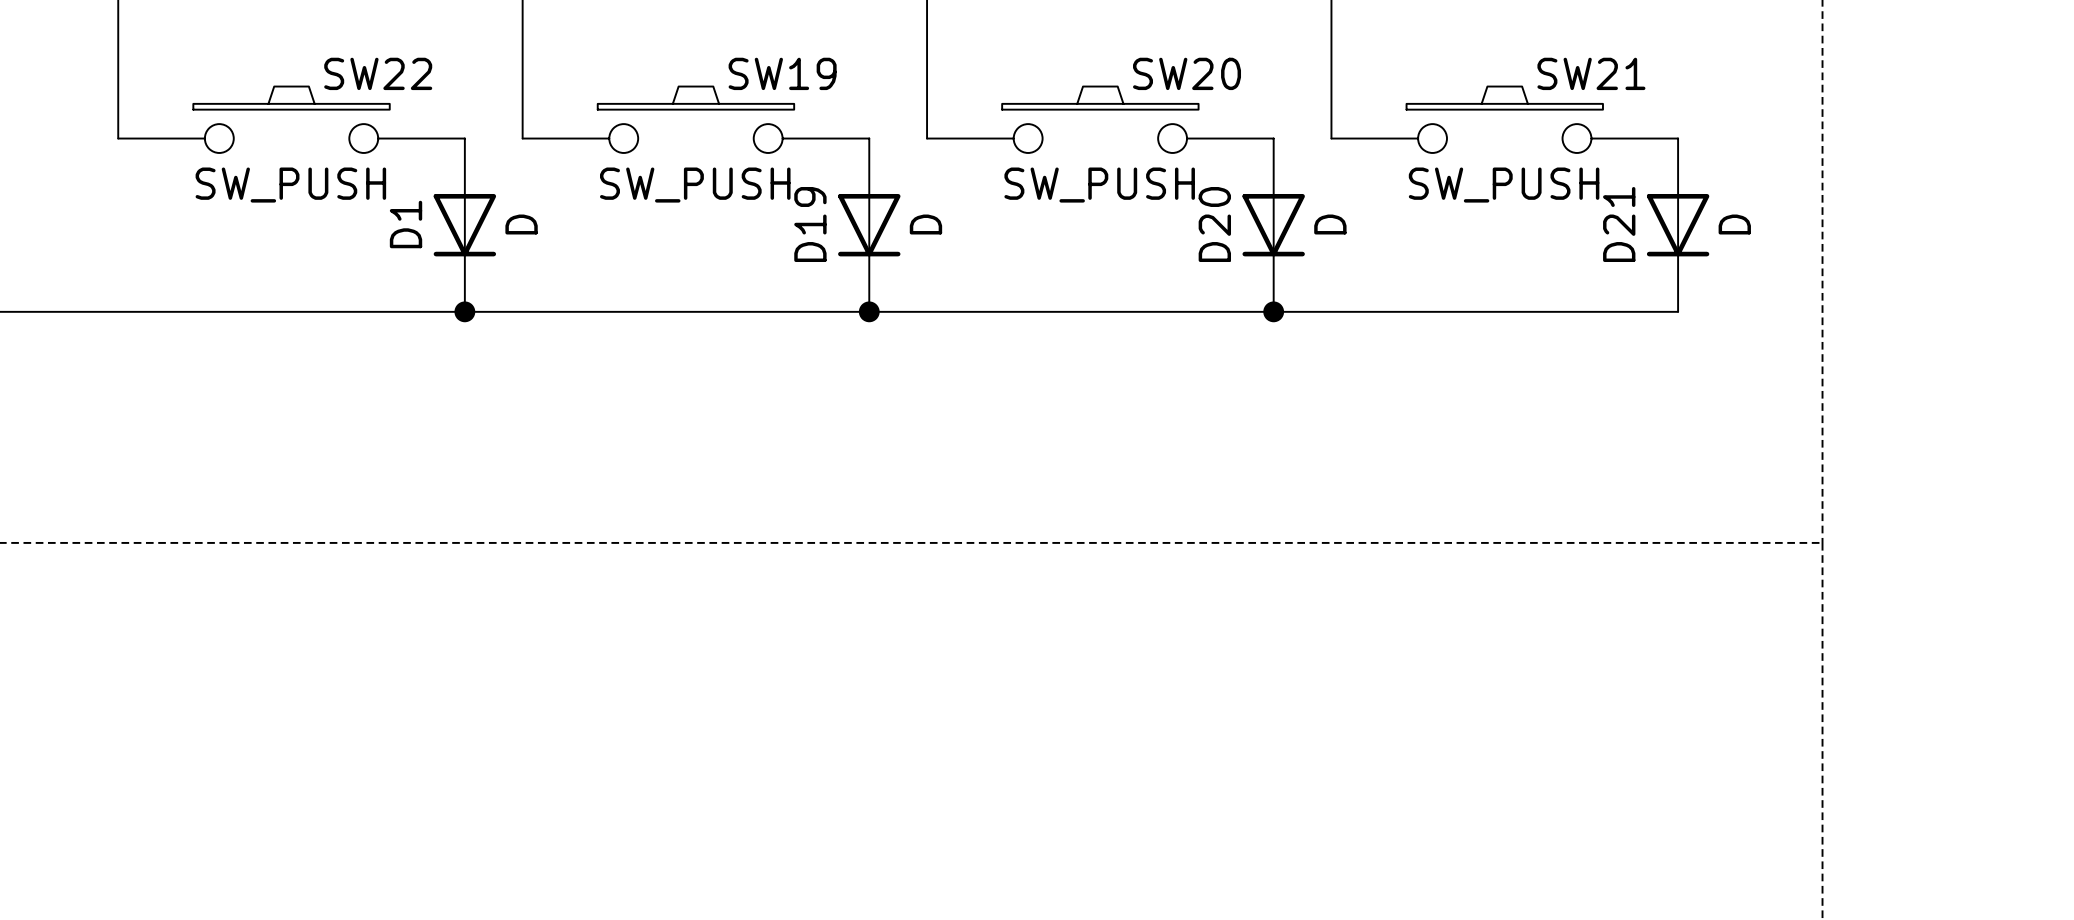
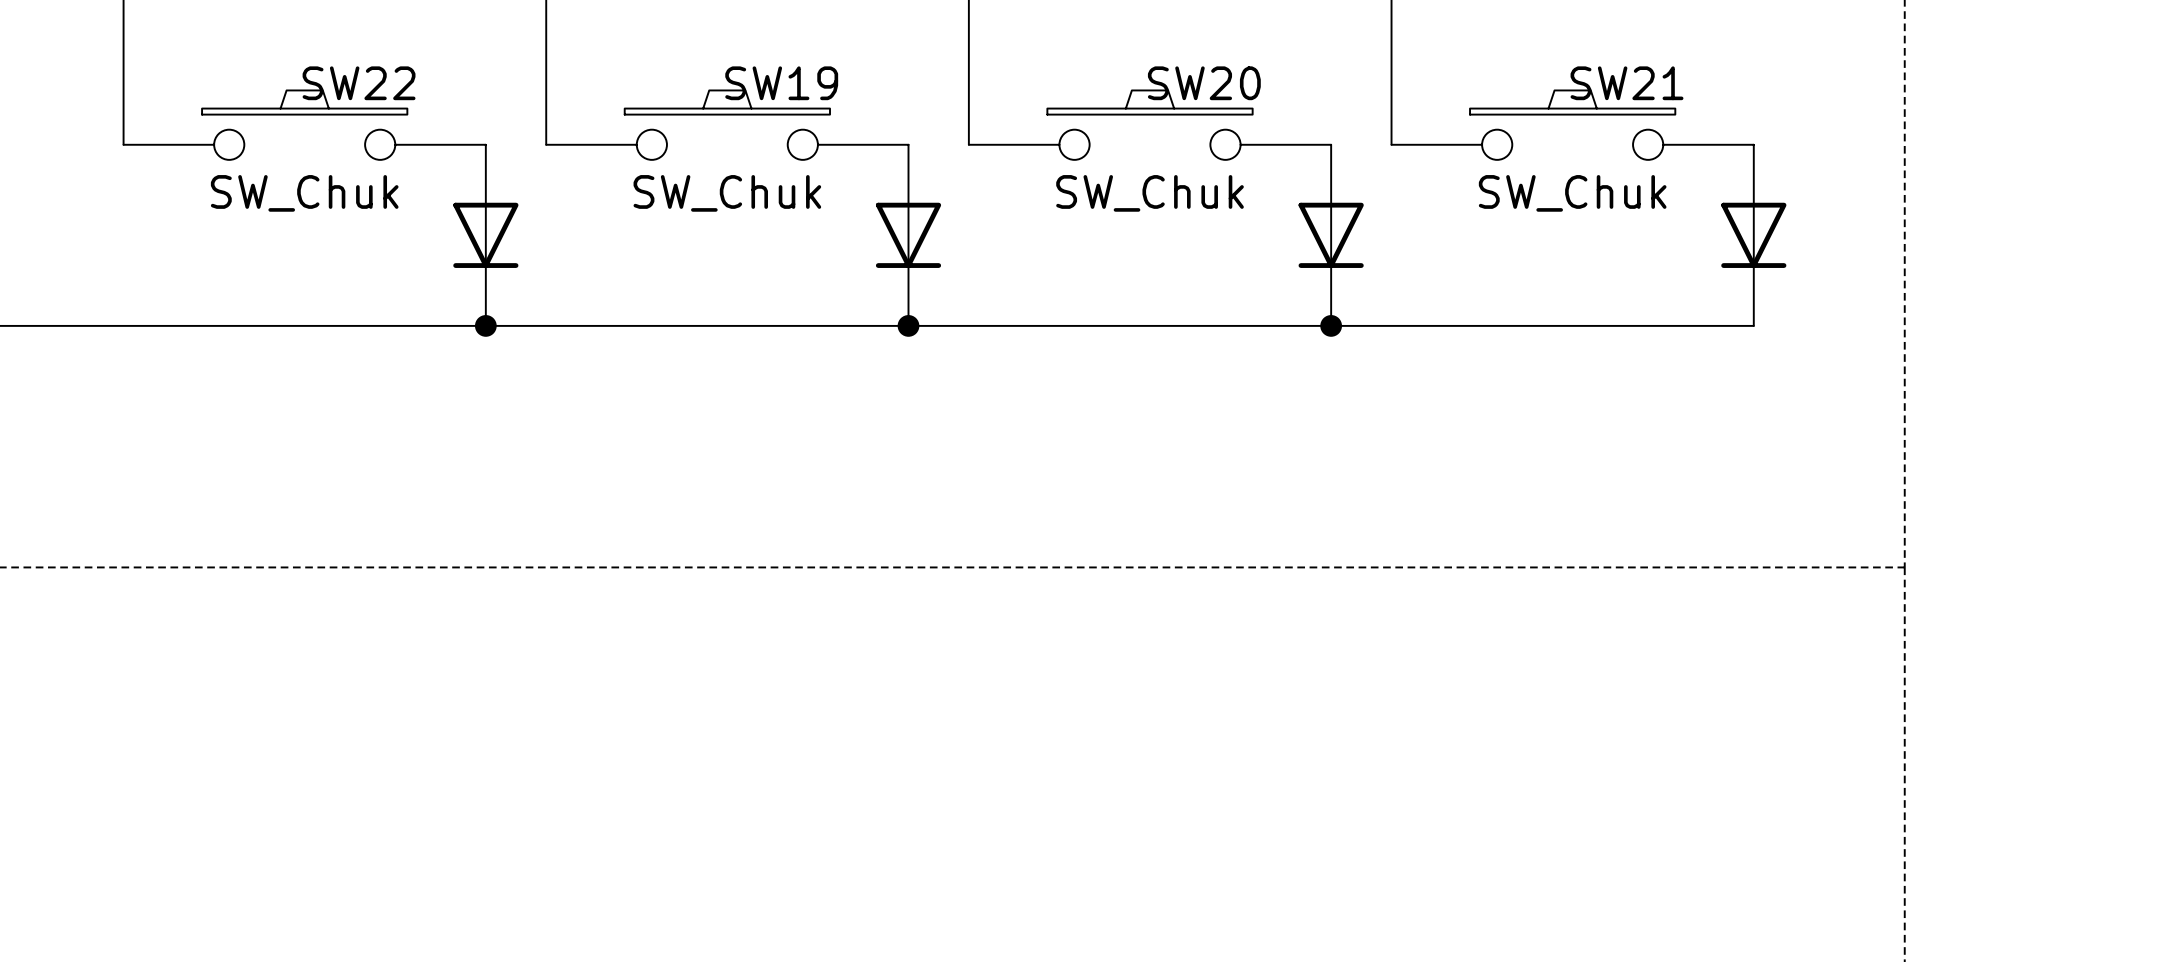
SW22 name position: SW22 (378, 73) -> SW22 (359, 83)
SW19 name position: SW19 (782, 73) -> SW19 (781, 83)
SW20 name position: SW20 (1187, 73) -> SW20 (1204, 83)
SW21 name position: SW21 (1591, 73) -> SW21 (1627, 83)
SW22 symbol: [118, 86, 465, 153] -> [123, 90, 519, 326]
SW19 symbol: [522, 86, 870, 153] -> [546, 90, 942, 326]
SW20 symbol: [927, 86, 1274, 153] -> [968, 90, 1364, 326]
SW21 symbol: [1331, 86, 1679, 153] -> [1391, 90, 1787, 326]
SW22 value: SW_PUSH (290, 185) -> SW_Chuk (304, 193)
SW19 value: SW_PUSH (695, 185) -> SW_Chuk (727, 193)
SW20 value: SW_PUSH (1099, 185) -> SW_Chuk (1150, 193)
SW21 value: SW_PUSH (1504, 185) -> SW_Chuk (1572, 193)
D1: D (464, 225) -> none
D19: D (869, 225) -> none
D20: D (1273, 225) -> none
D21: D (1678, 225) -> none

